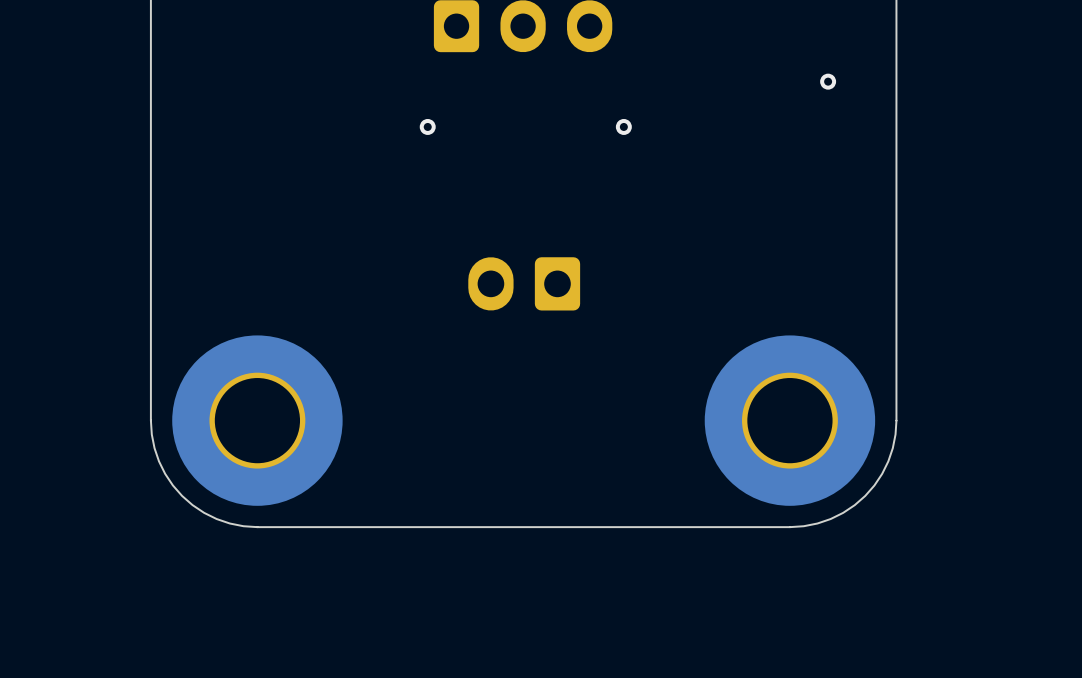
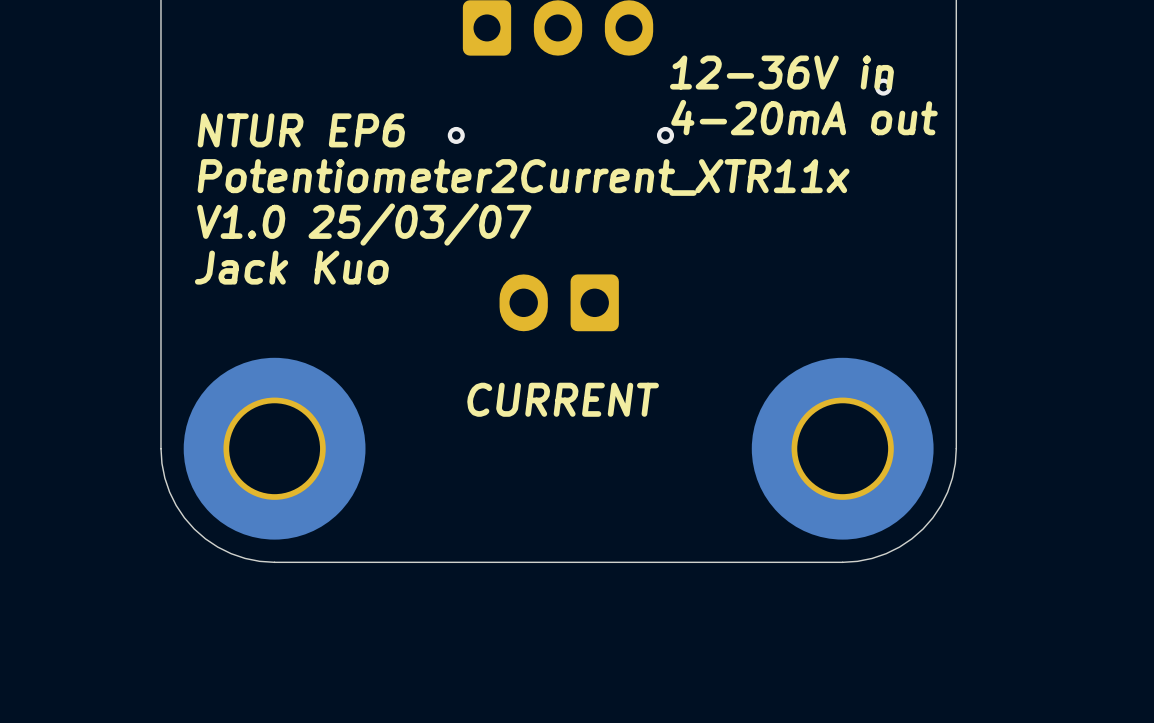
text: none -> 12-36V in (781, 72)
text: none -> 4-20mA out (804, 117)
text: none -> NTUR EP6 (301, 130)
text: none -> Potentiometer2Current_XTR11x (523, 177)
text: none -> V1.0 25/03/07 (364, 224)
text: none -> Jack Kuo (291, 267)
text: none -> CURRENT (563, 399)

